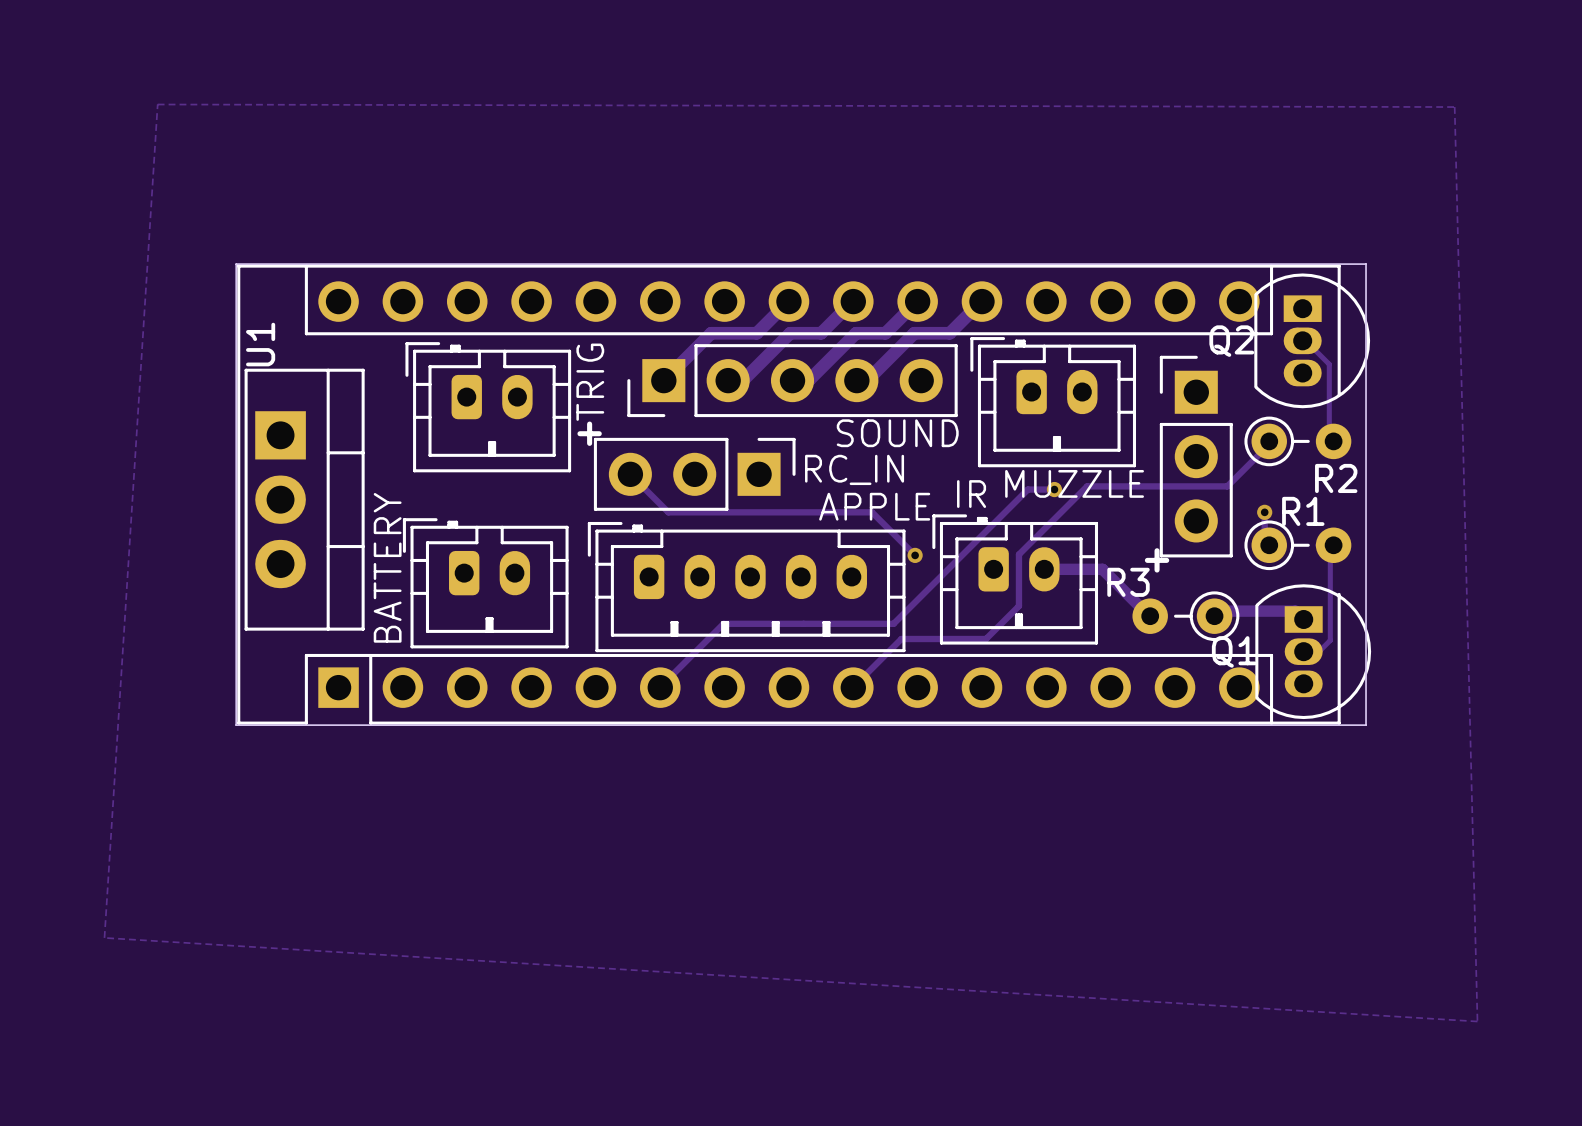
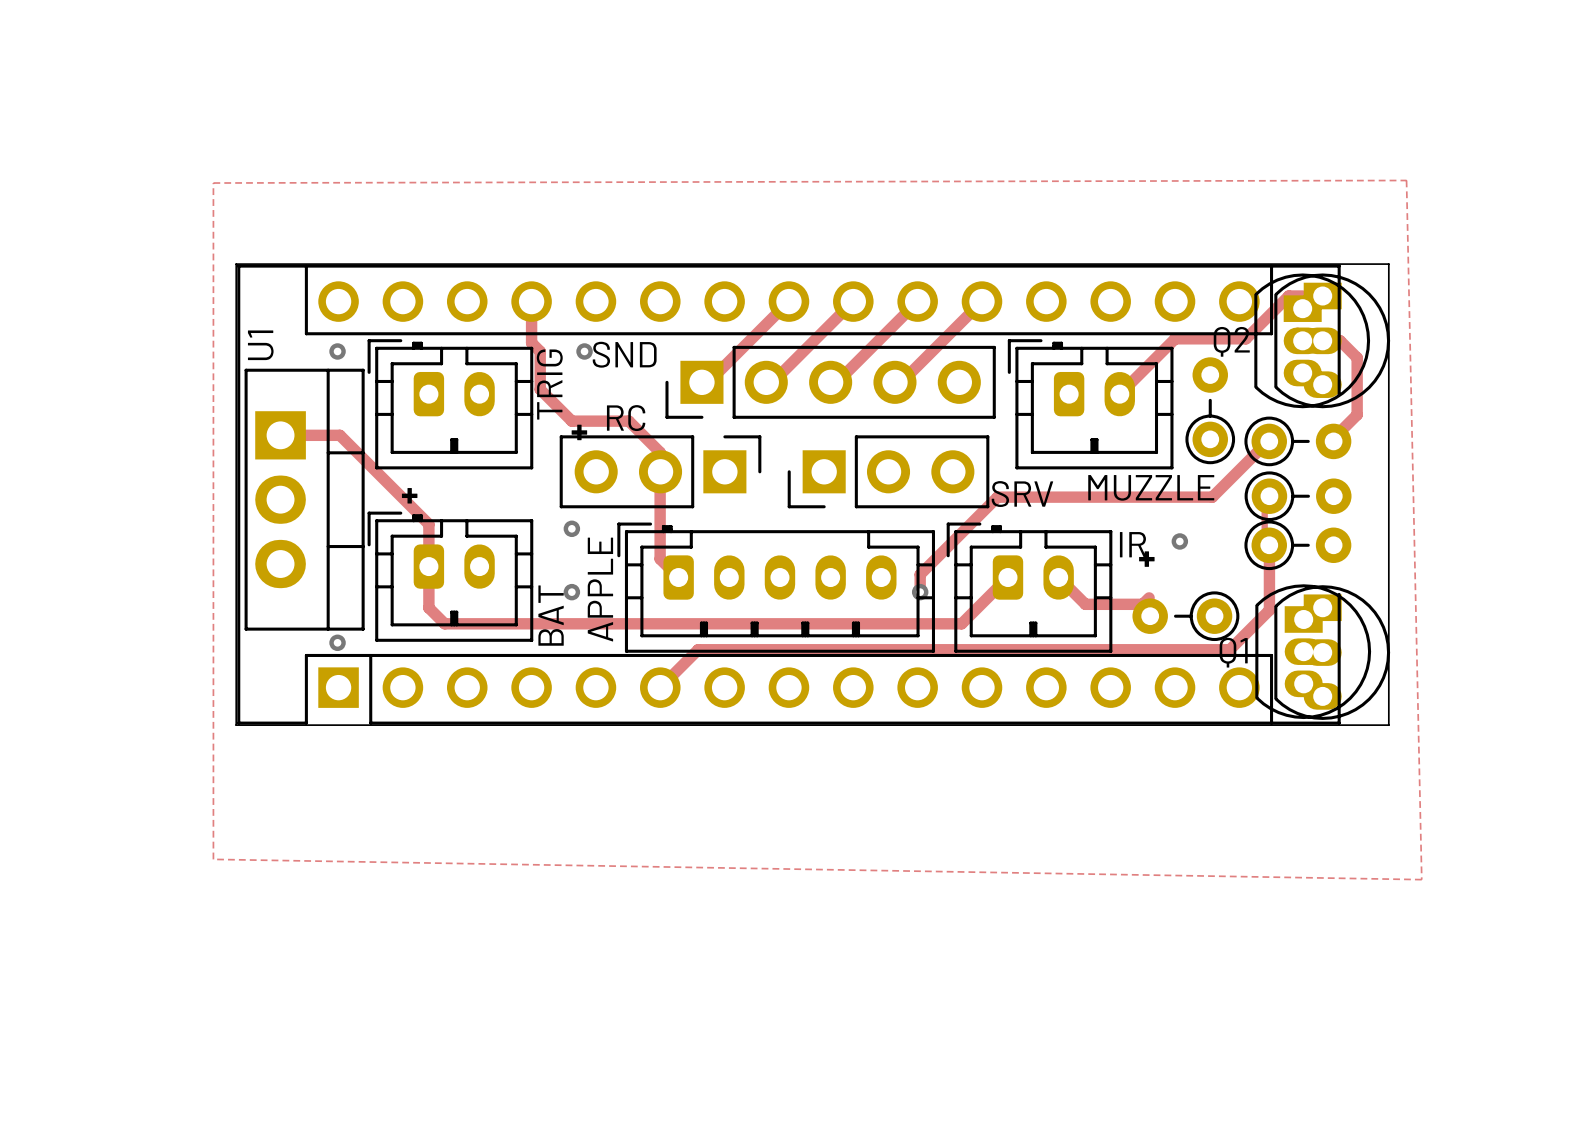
zone outline: (157, 104) (1454, 107) (1477, 1021) (104, 937) (157, 104) -> (1406, 180) (213, 183) (213, 859) (1421, 879) (1406, 180)
board edge: (1366, 264) (1366, 725) -> (1366, 264) (1388, 264) (1388, 725) (1366, 725)
track: none -> (1302, 296) (1288, 296) (1246, 338) (1175, 338) (1119, 394)
track: none -> (531, 301) (531, 342) (540, 351) (540, 389) (571, 421) (628, 421) (660, 452) (660, 559) (678, 577)
track: (788, 301) (756, 333) (711, 333) (663, 380) -> (788, 301) (708, 382) (701, 382)
track: (852, 301) (821, 333) (790, 333) (742, 380) (728, 380) -> (853, 301) (772, 382) (766, 382)
track: (917, 301) (885, 333) (856, 333) (808, 380) (792, 380) -> (917, 301) (836, 382) (830, 382)
track: (981, 301) (949, 333) (914, 333) (866, 380) (856, 380) -> (981, 301) (901, 382) (894, 382)
track: (1305, 340) (1329, 364) (1329, 435) (1320, 443) -> (1305, 340) (1340, 340) (1357, 357) (1357, 414) (1333, 440)
part: none -> (1332, 340)
via: none -> (337, 351)
via: none -> (584, 351)
text: none -> SND (624, 354)
part position: (792, 380) -> (830, 382)
text position: TRIG (590, 382) -> TRIG (549, 384)
part position: (1053, 402) -> (1090, 404)
part position: (488, 407) -> (450, 404)
part: none -> (1210, 410)
text: none -> RC (626, 418)
text: SOUND (897, 433) -> none
track: none -> (1269, 440) (1212, 497) (997, 497) (920, 574) (920, 592)
track: (1269, 443) (1227, 486) (1087, 486) (1018, 554) (1018, 606) (986, 639) (901, 639) (852, 687) -> none
part: (1196, 456) -> none
text: RC_IN (854, 469) -> none
part: none -> (888, 471)
track: (630, 474) (668, 512) (872, 512) (915, 555) -> none
part position: (694, 474) -> (660, 471)
R2 name: R2 (1336, 478) -> none
text position: MUZZLE (1074, 483) -> MUZZLE (1151, 487)
track: (1054, 489) (1027, 489) (893, 623) -> (1007, 577) (961, 623) (893, 623)
via: (1054, 489) -> none
text position: IR (971, 494) -> IR (1133, 544)
text: none -> SRV (1022, 494)
part: none -> (1298, 496)
text: none -> + (409, 495)
text rotation: 0° (874, 506) -> 90° counterclockwise (600, 589)
text position: APPLE (874, 506) -> APPLE (600, 589)
R1 name: R1 (1303, 511) -> none
via: (1264, 512) -> none
via: none -> (571, 528)
via: none -> (1179, 541)
track: (1317, 545) (1330, 557) (1330, 640) (1319, 651) (1303, 651) -> none
track: none -> (1269, 550) (1269, 610) (1229, 649) (698, 649) (660, 687)
via: (915, 555) -> none
text: BATTERY (387, 567) -> none
track: (1044, 569) (1102, 569) (1144, 611) -> none
track: none -> (1058, 577) (1085, 604) (1142, 604) (1149, 597)
part position: (1015, 579) -> (1029, 587)
R3 name: R3 (1128, 582) -> none
part position: (485, 583) -> (450, 576)
part position: (746, 587) -> (776, 587)
via: none -> (571, 592)
via: none -> (920, 592)
text: none -> BAT (551, 615)
track: (1222, 611) (1295, 611) (1303, 619) -> none
track: (723, 623) (659, 687) -> (723, 623) (444, 623) (428, 607) (428, 524) (339, 435) (280, 435)
track width: thin (723, 623) (893, 623) -> thick (723, 623) (893, 623)
via: none -> (337, 642)
part: none -> (1332, 652)

